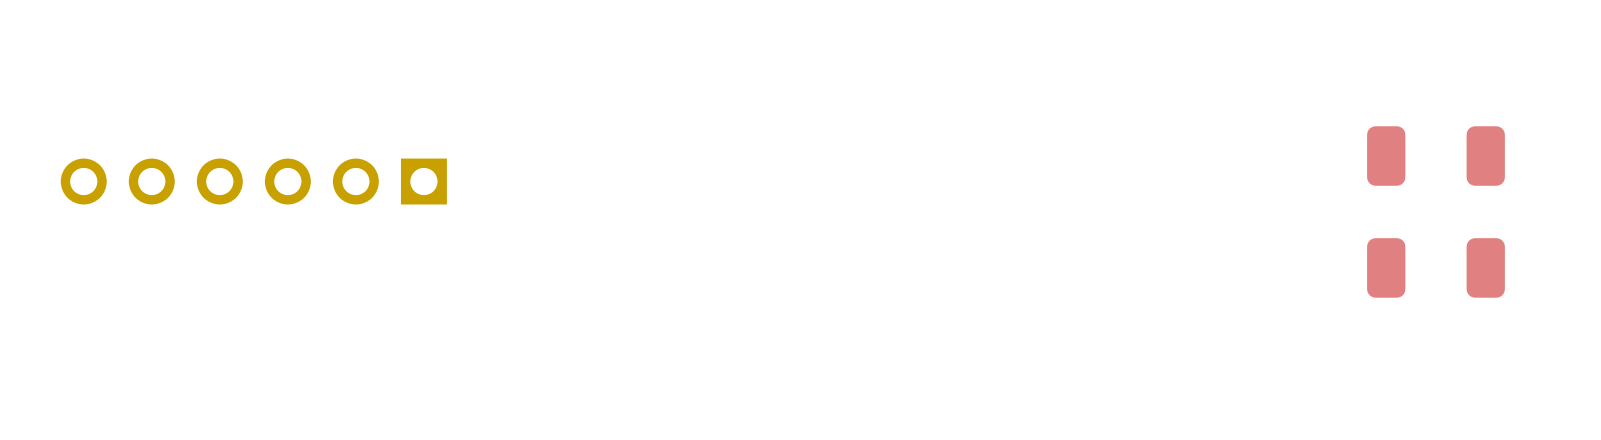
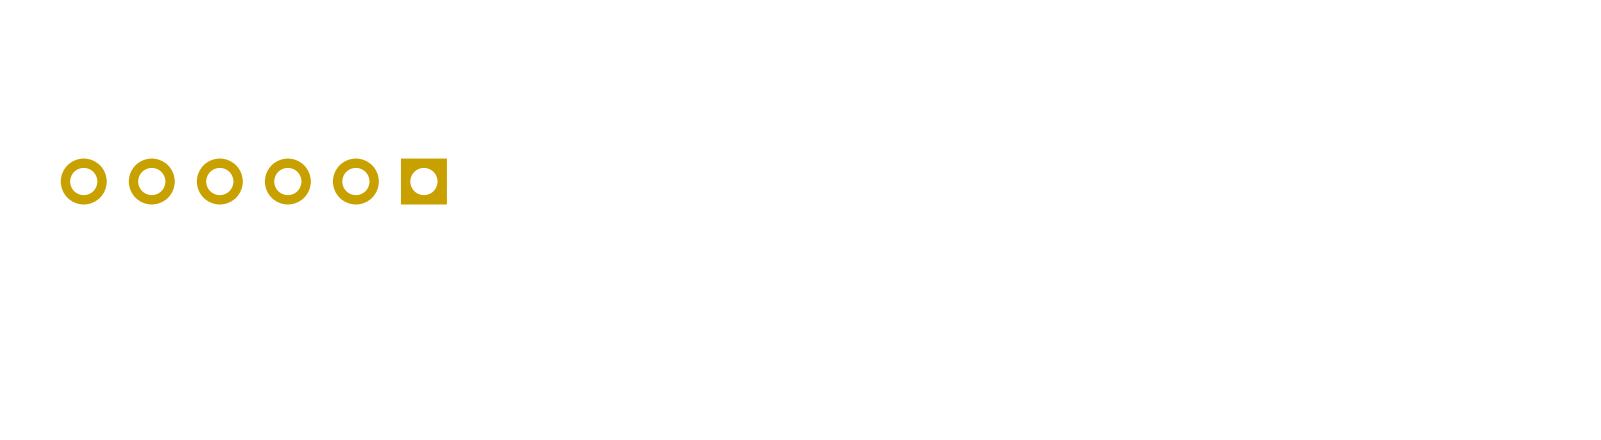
part: (1435, 156) -> none
part: (1435, 267) -> none

